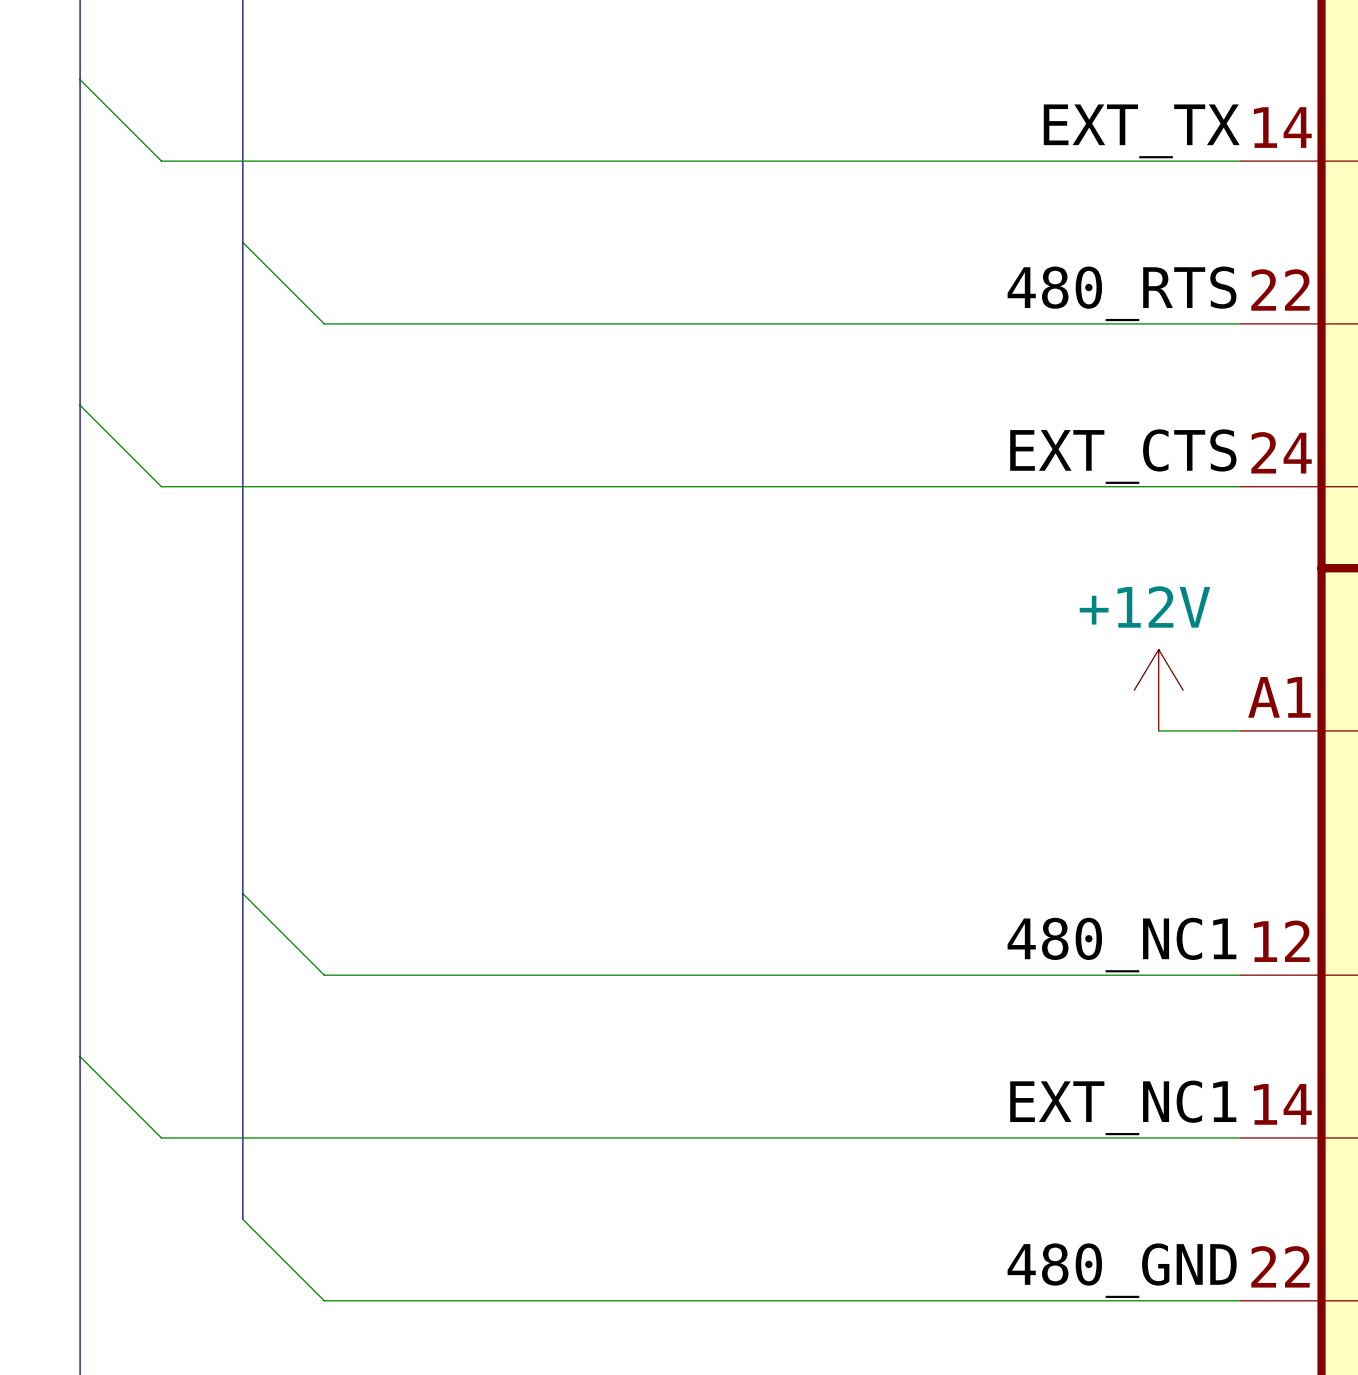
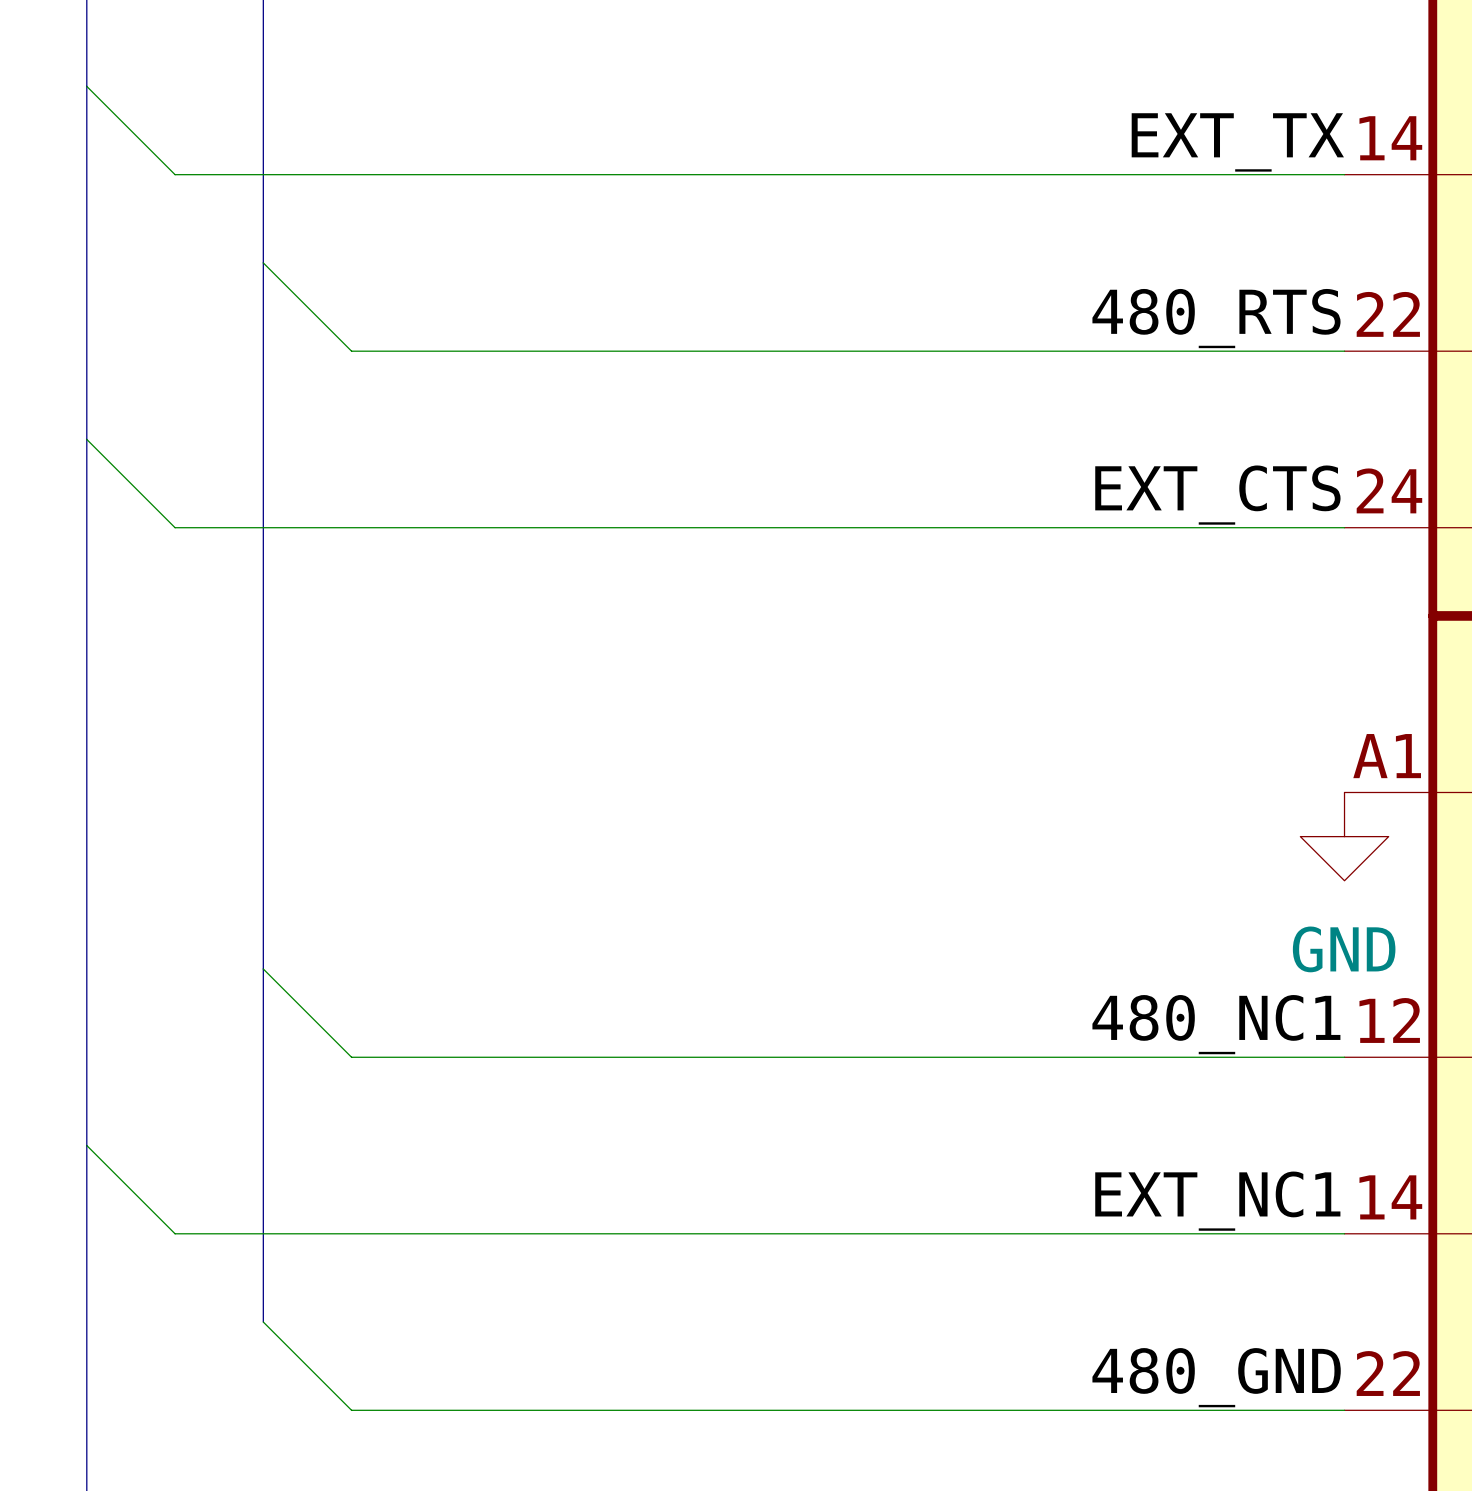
power symbol: +12V (1158, 690) -> none
wire: (1158, 730) (1240, 730) -> none
power symbol: none -> GND (1344, 836)

